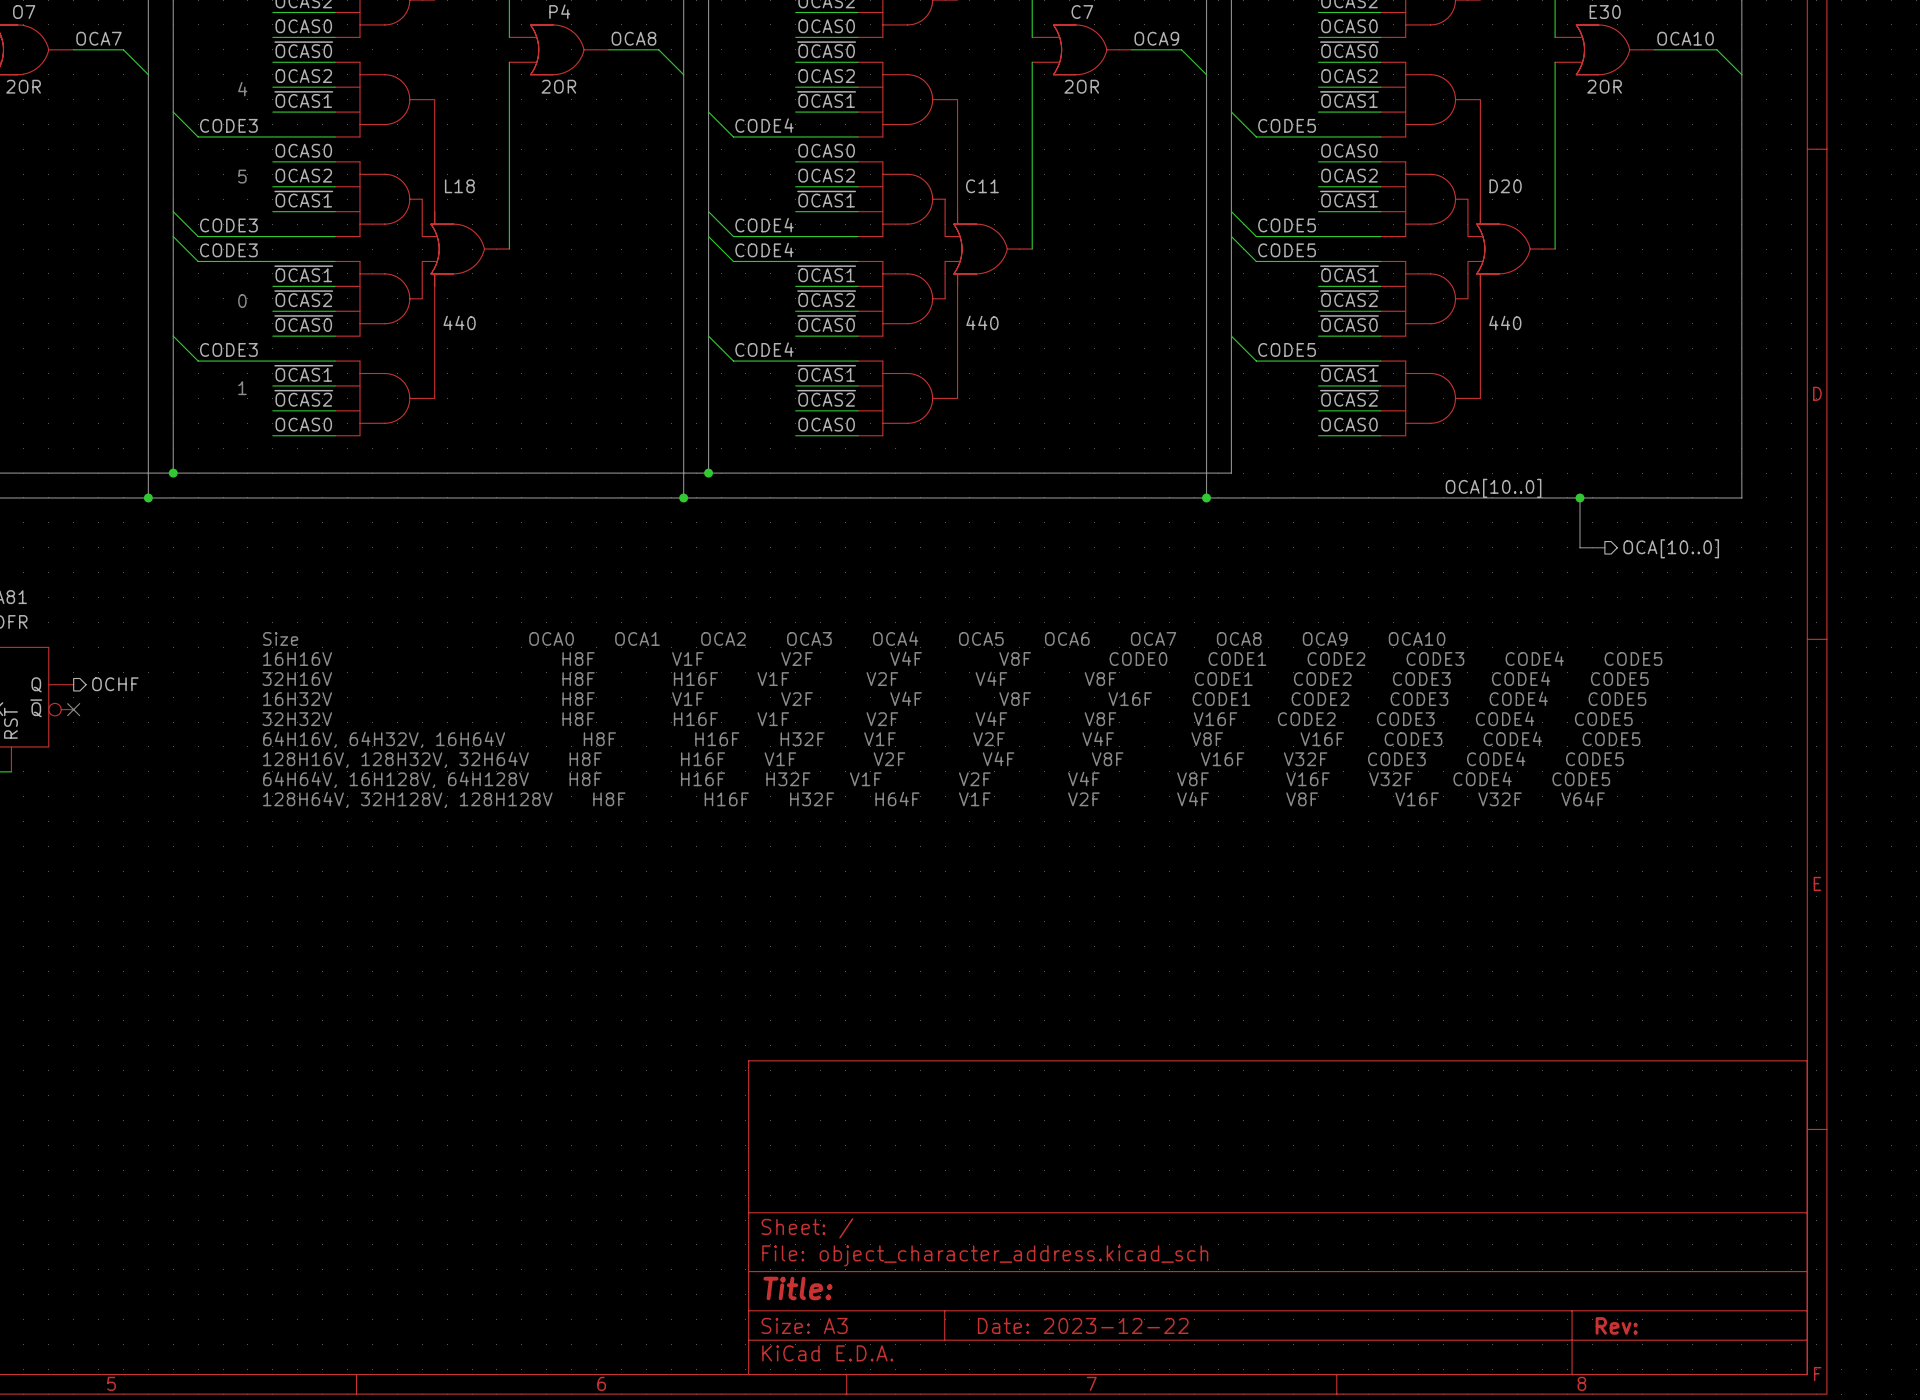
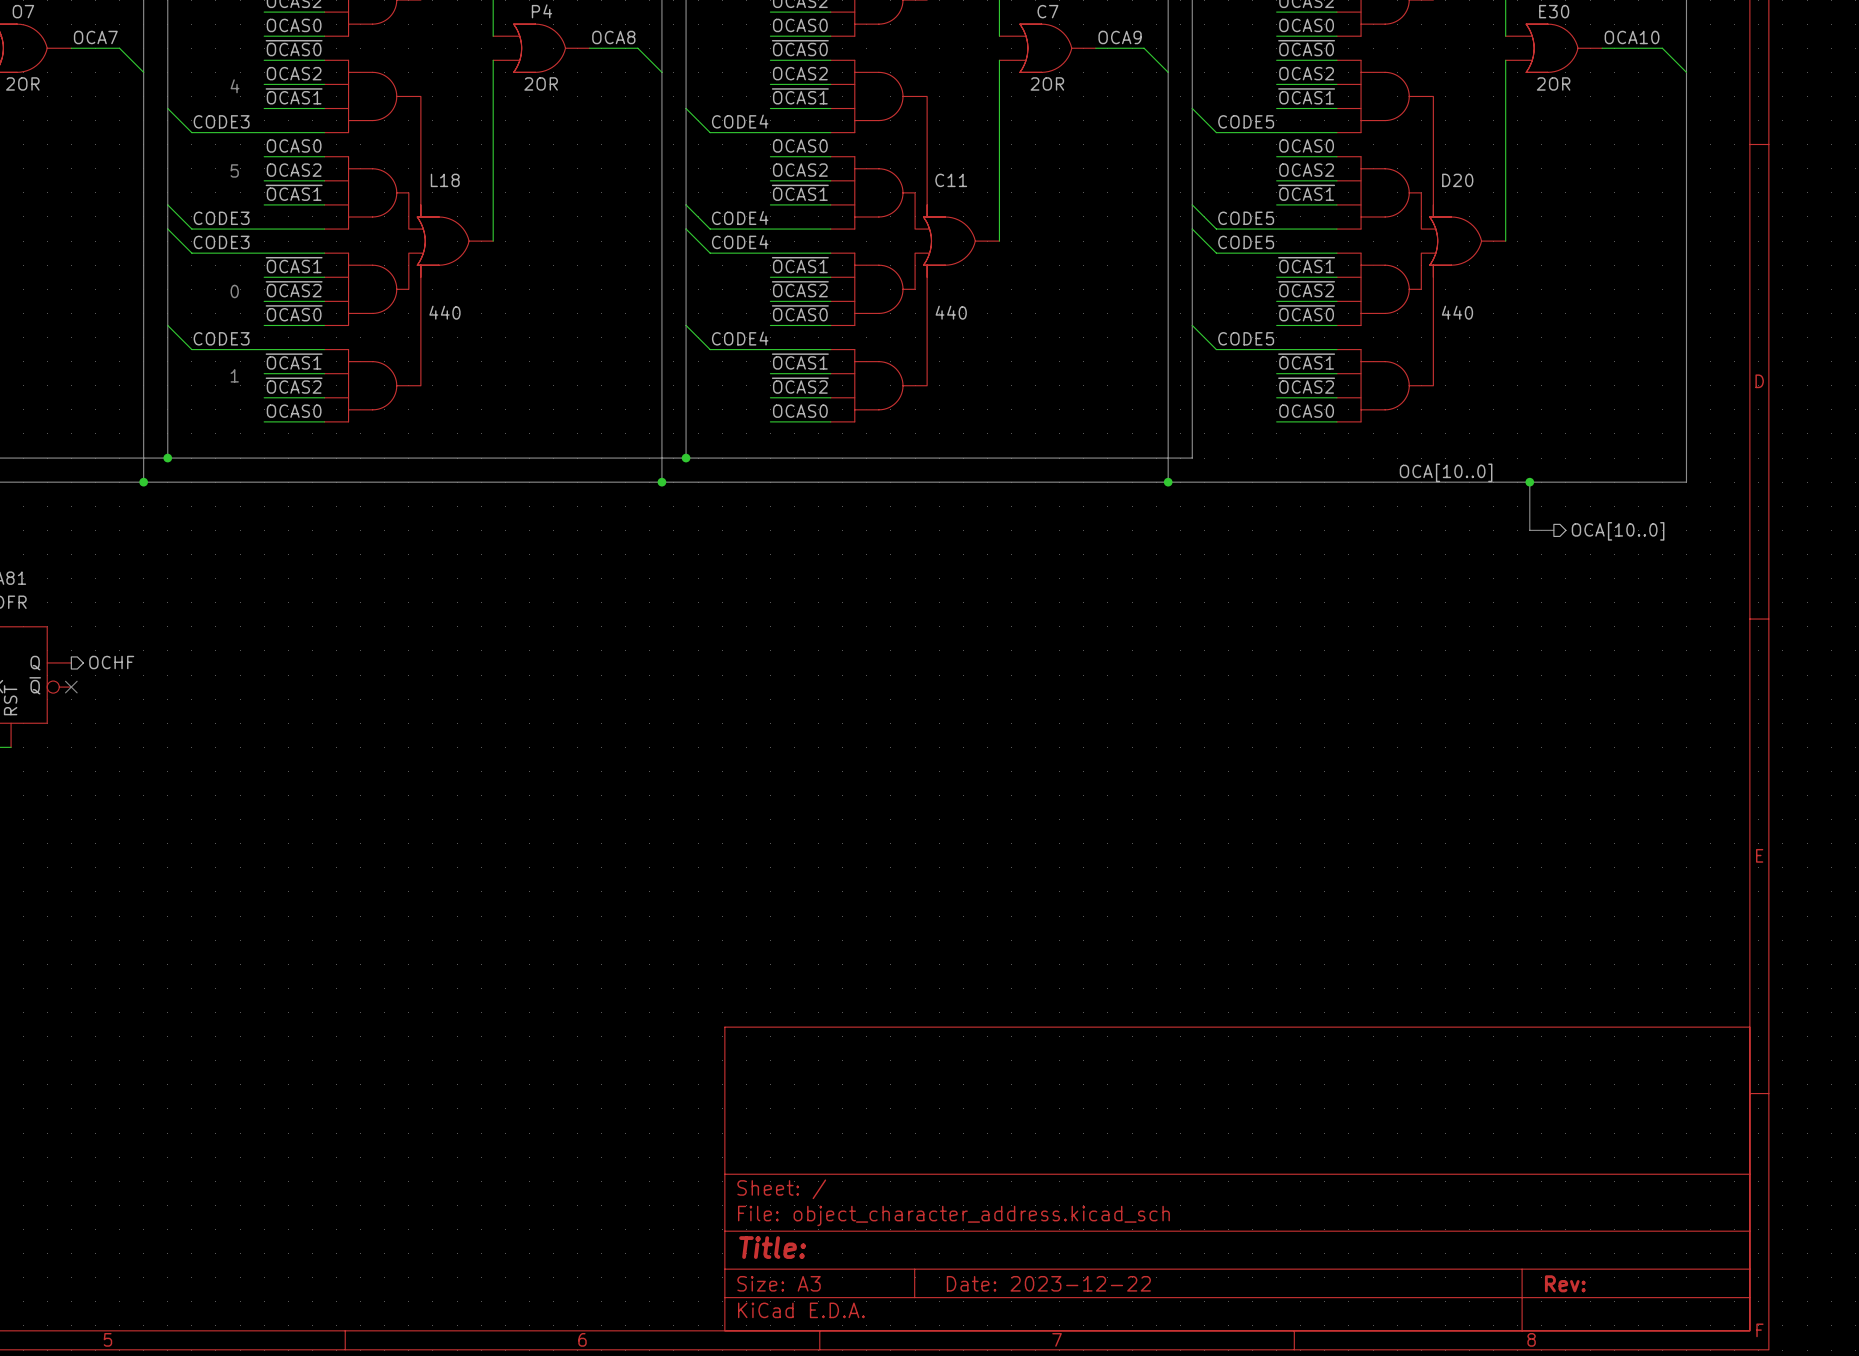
text: Size OCA0 OCA1 OCA2 OCA3 OCA4 OCA5 OCA6 OCA7 OCA8 OCA9 OCA10 (854, 638) -> none
text: 16H16V H8F V1F V2F V4F V8F CODE0 CODE1 CODE2 CODE3 CODE4 CODE5 (962, 658) -> none
text: 32H16V H8F H16F V1F V2F V4F V8F CODE1 CODE2 CODE3 CODE4 CODE5 (955, 678) -> none
text: 16H32V H8F V1F V2F V4F V8F V16F CODE1 CODE2 CODE3 CODE4 CODE5 (954, 698) -> none
text: 32H32V H8F H16F V1F V2F V4F V8F V16F CODE2 CODE3 CODE4 CODE5 (947, 718) -> none
text: 64H16V, 64H32V, 16H64V H8F H16F H32F V1F V2F V4F V8F V16F CODE3 CODE4 CODE5 (951, 739) -> none
text: 128H16V, 128H32V, 32H64V H8F H16F V1F V2F V4F V8F V16F V32F CODE3 CODE4 CODE5 (943, 759) -> none
text: 64H64V, 16H128V, 64H128V H8F H16F H32F V1F V2F V4F V8F V16F V32F CODE4 CODE5 (936, 779) -> none
text: 128H64V, 32H128V, 128H128V H8F H16F H32F H64F V1F V2F V4F V8F V16F V32F V64F (933, 799) -> none

